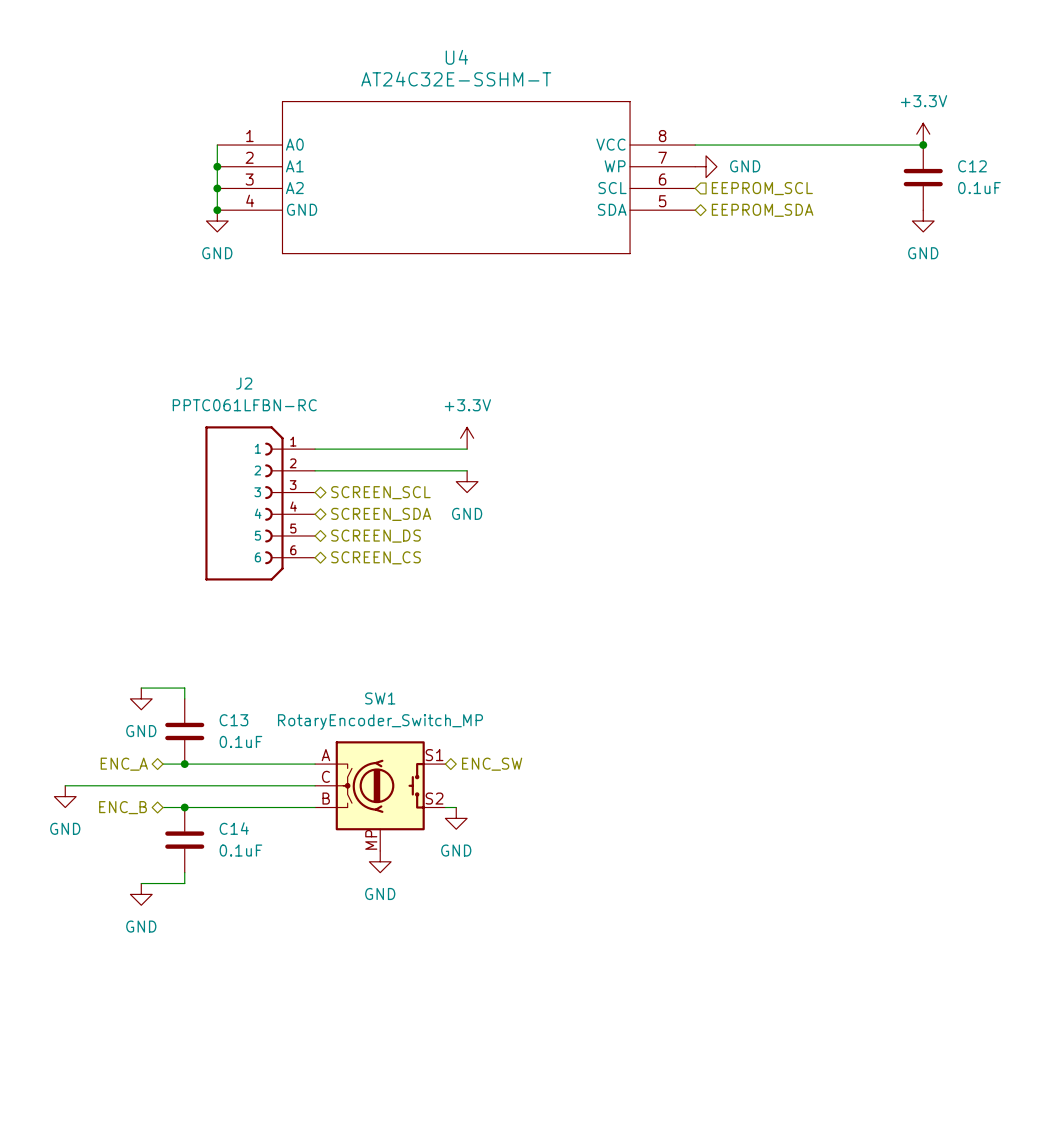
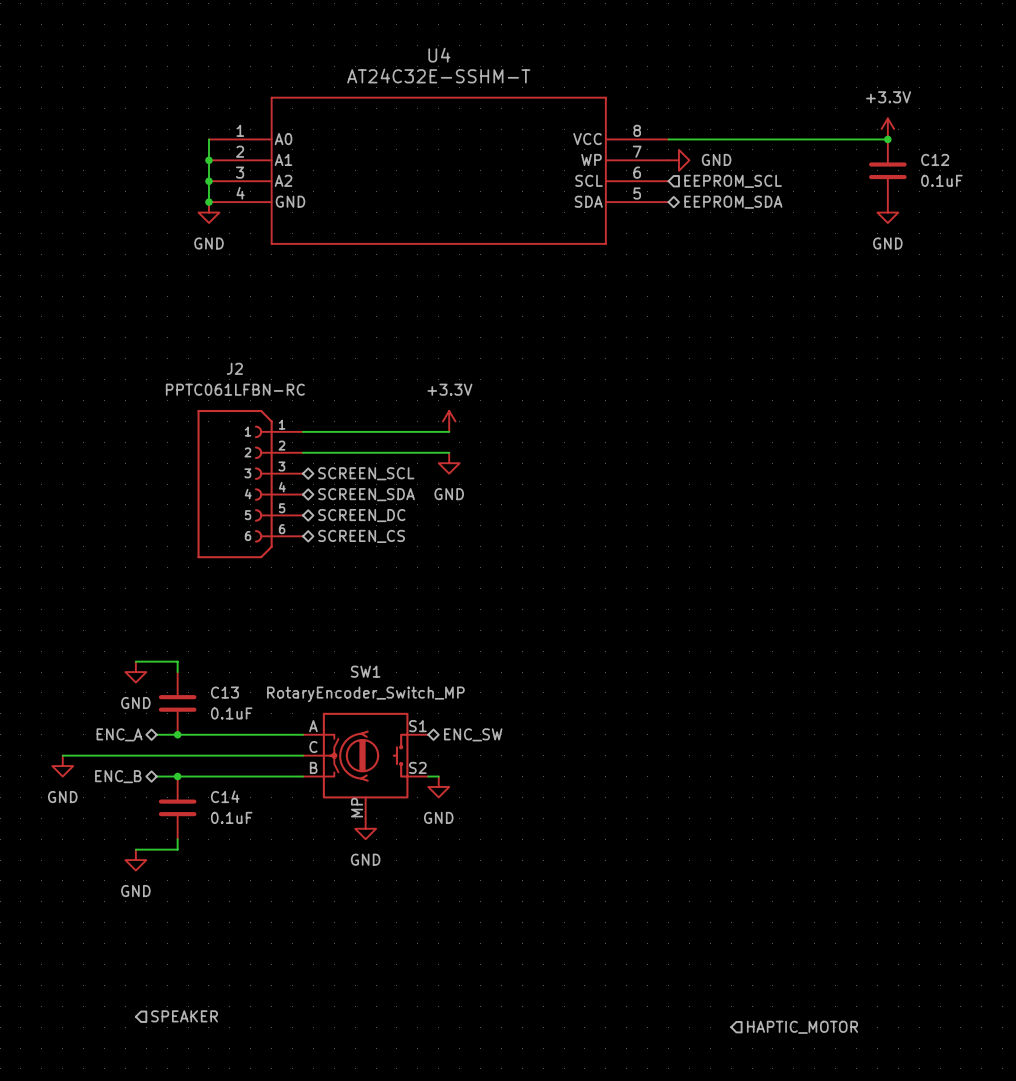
hierarchical label: SCREEN_DS (376, 536) -> SCREEN_DC (361, 515)
hierarchical label: none -> SPEAKER (184, 1016)
hierarchical label: none -> HAPTIC_MOTOR (802, 1027)

